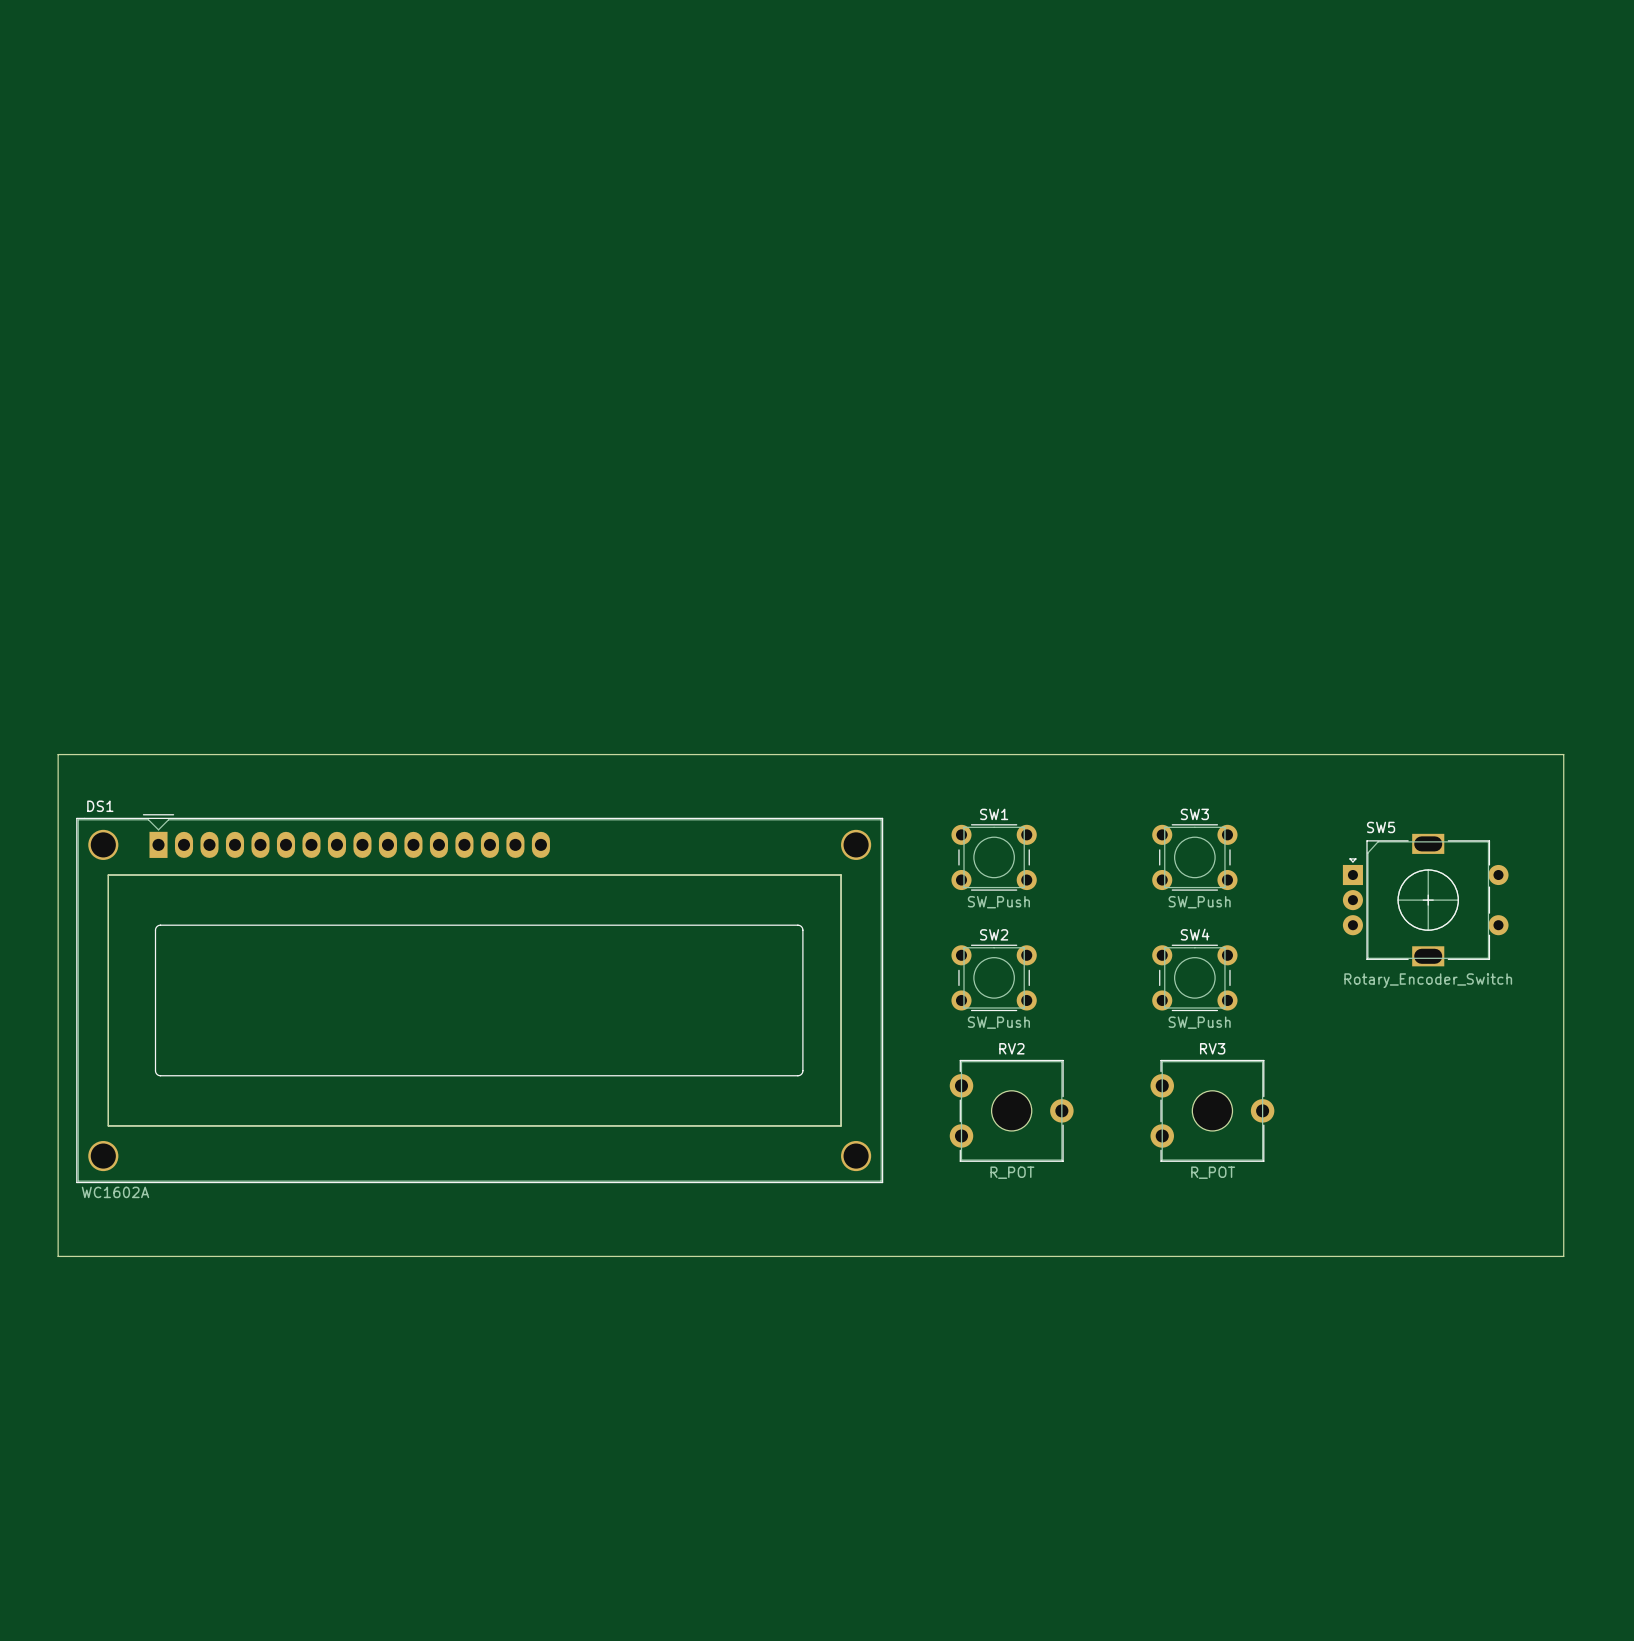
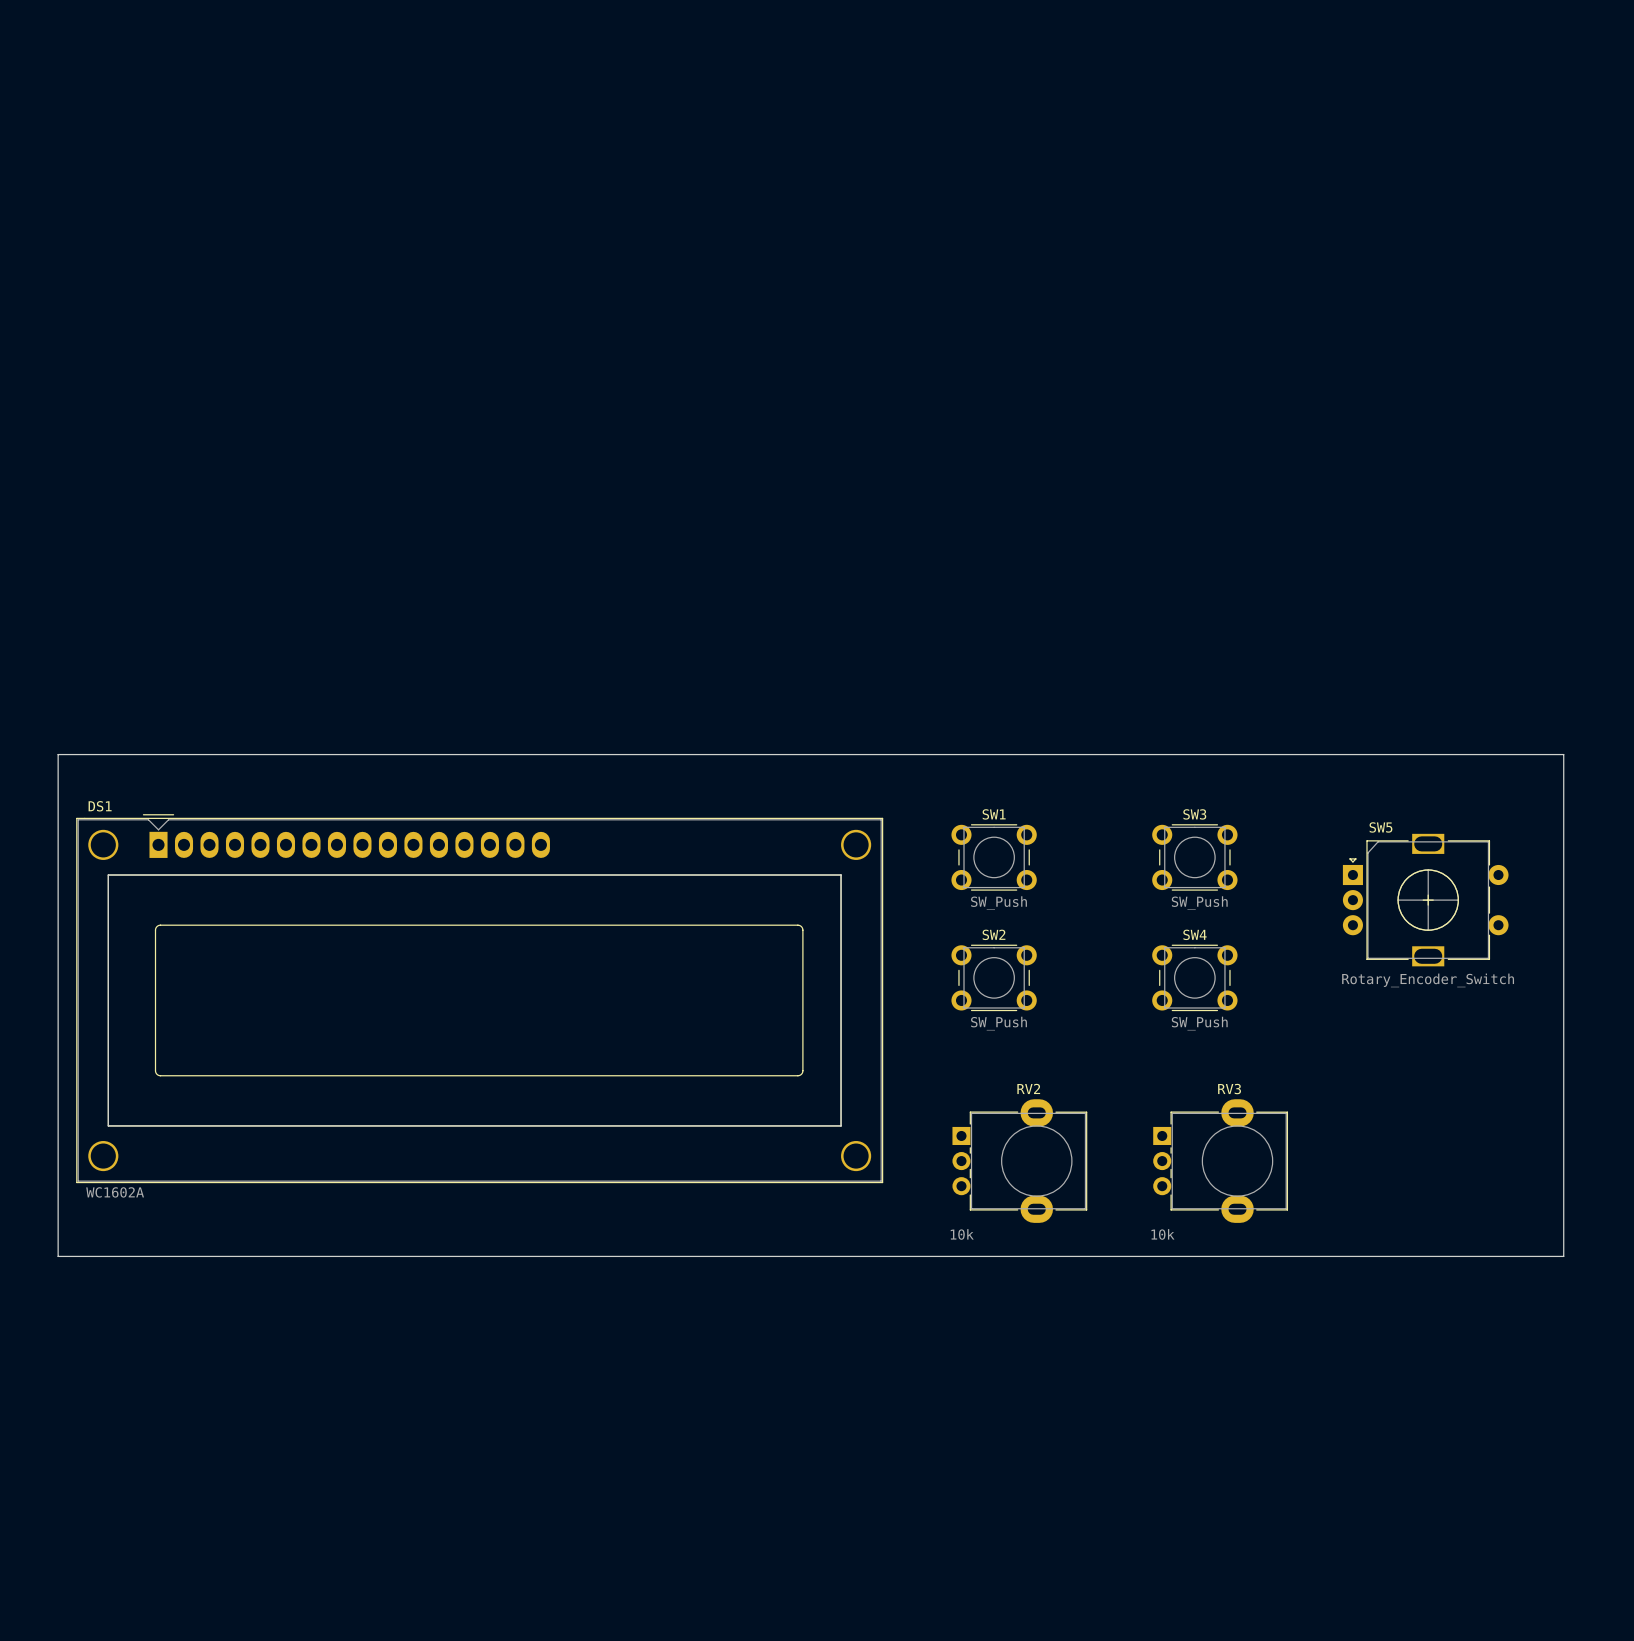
RV2 footprint: [949, 1059, 1074, 1162] -> [952, 1099, 1088, 1223]
RV3 footprint: [1150, 1059, 1275, 1162] -> [1153, 1099, 1289, 1223]
RV2 value: R_POT (1012, 1172) -> 10k (962, 1234)
RV3 value: R_POT (1213, 1172) -> 10k (1162, 1234)

